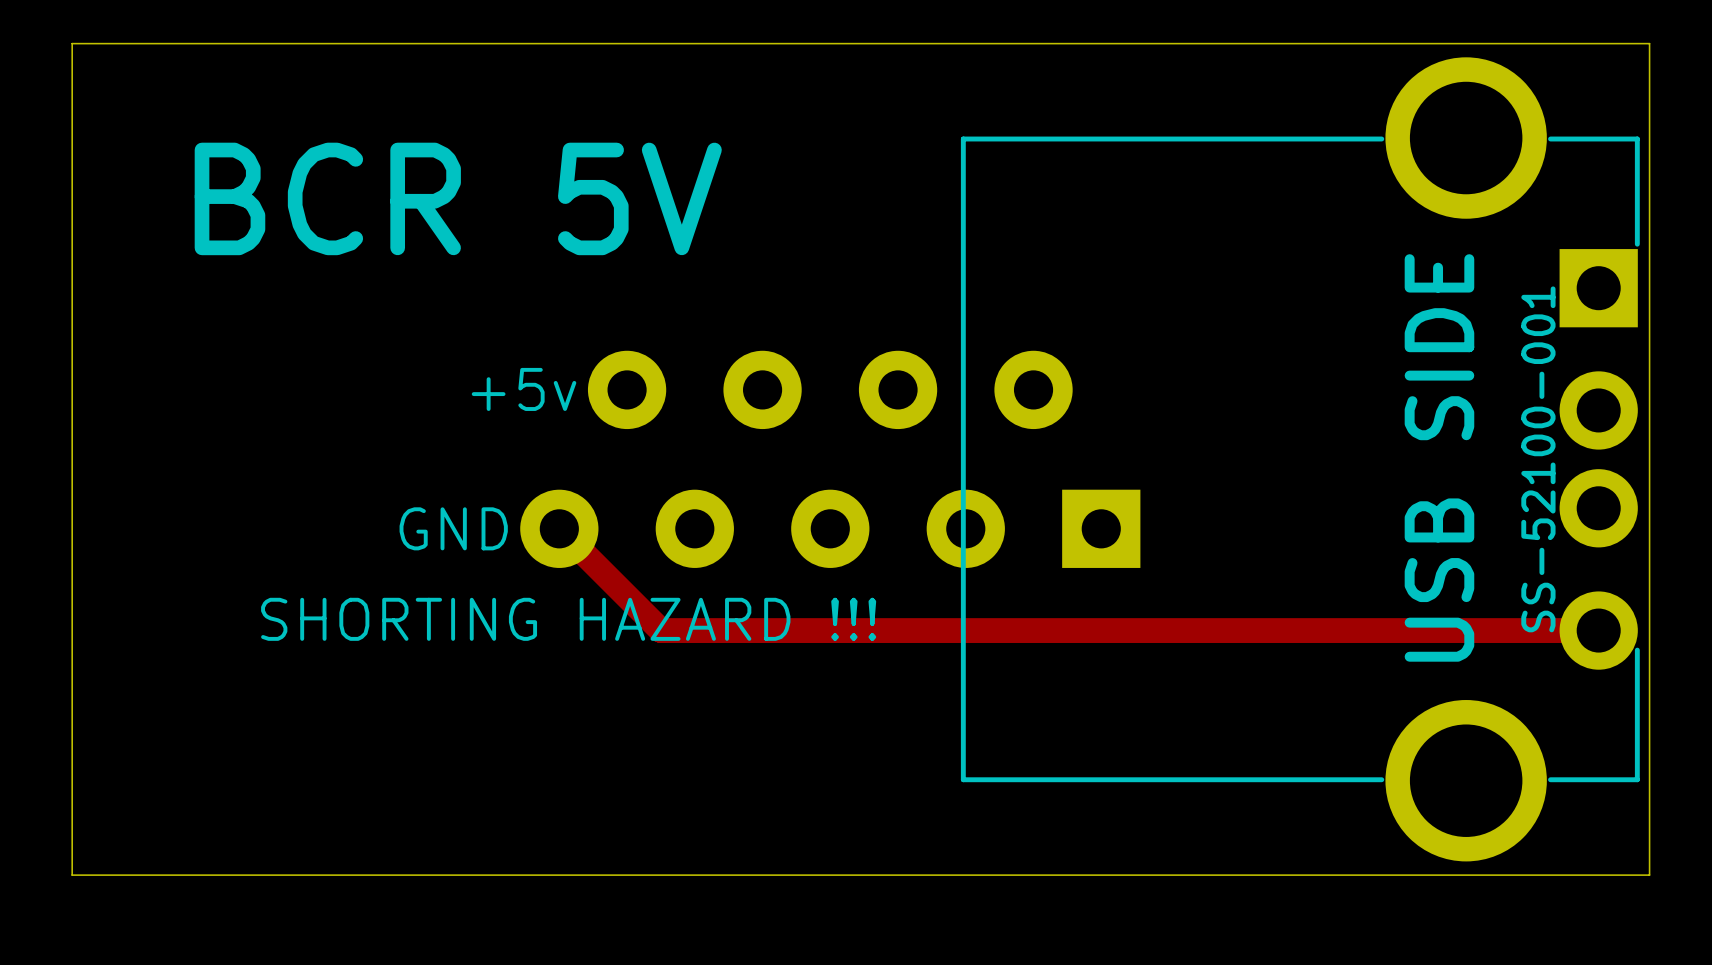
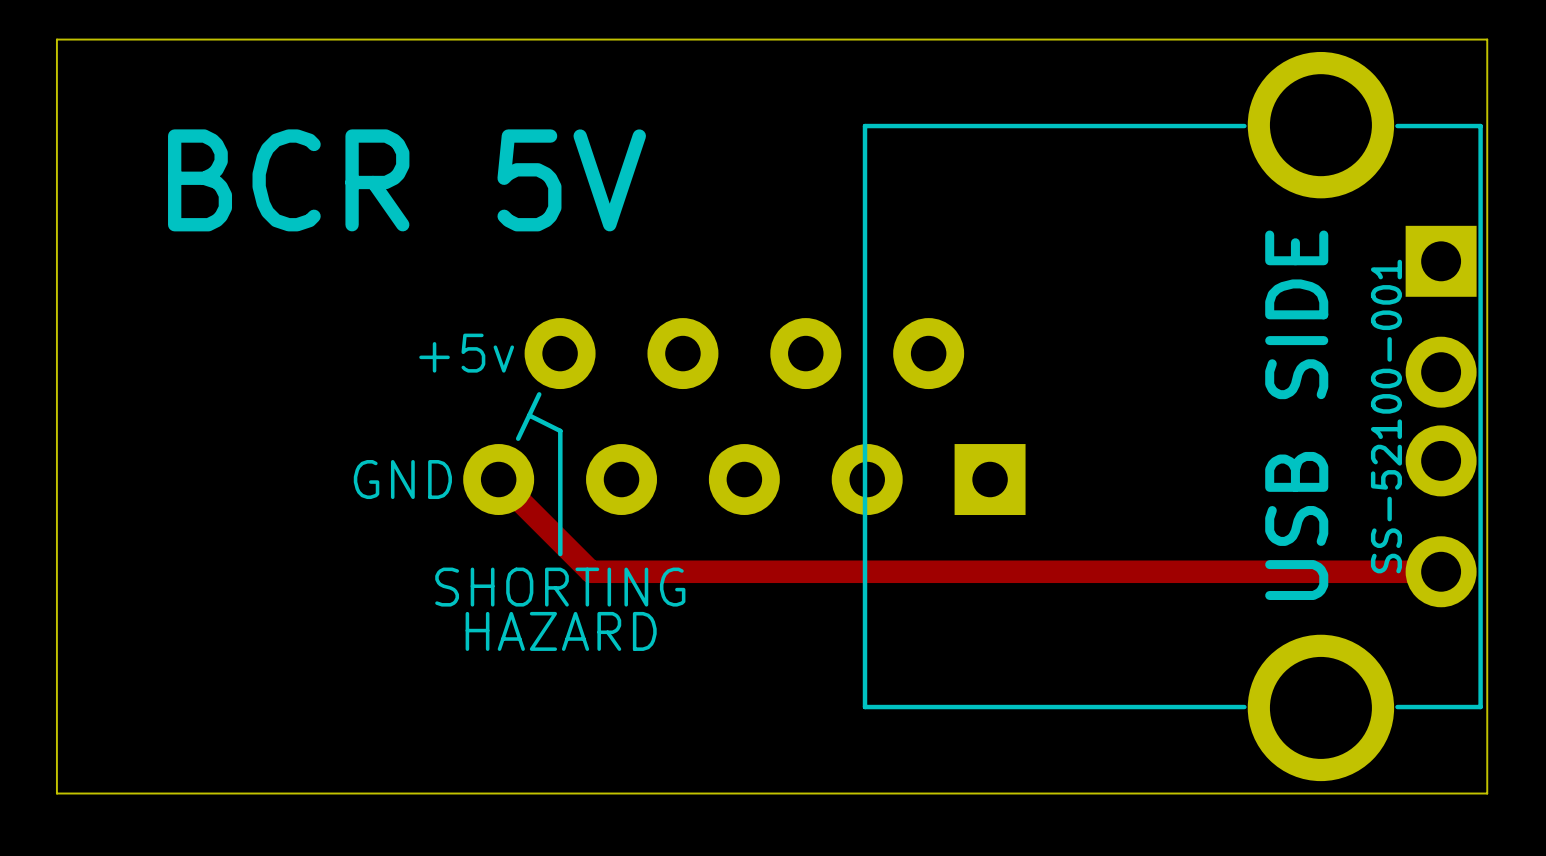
part footprint: [960, 57, 1640, 862] -> [862, 51, 1483, 782]
line: none -> (539, 394) (518, 438)
line: none -> (529, 415) (560, 430) (560, 554)
text: SHORTING HAZARD !!! (568, 619) -> none
text: none -> SHORTING (560, 587)
text: none -> HAZARD (561, 631)

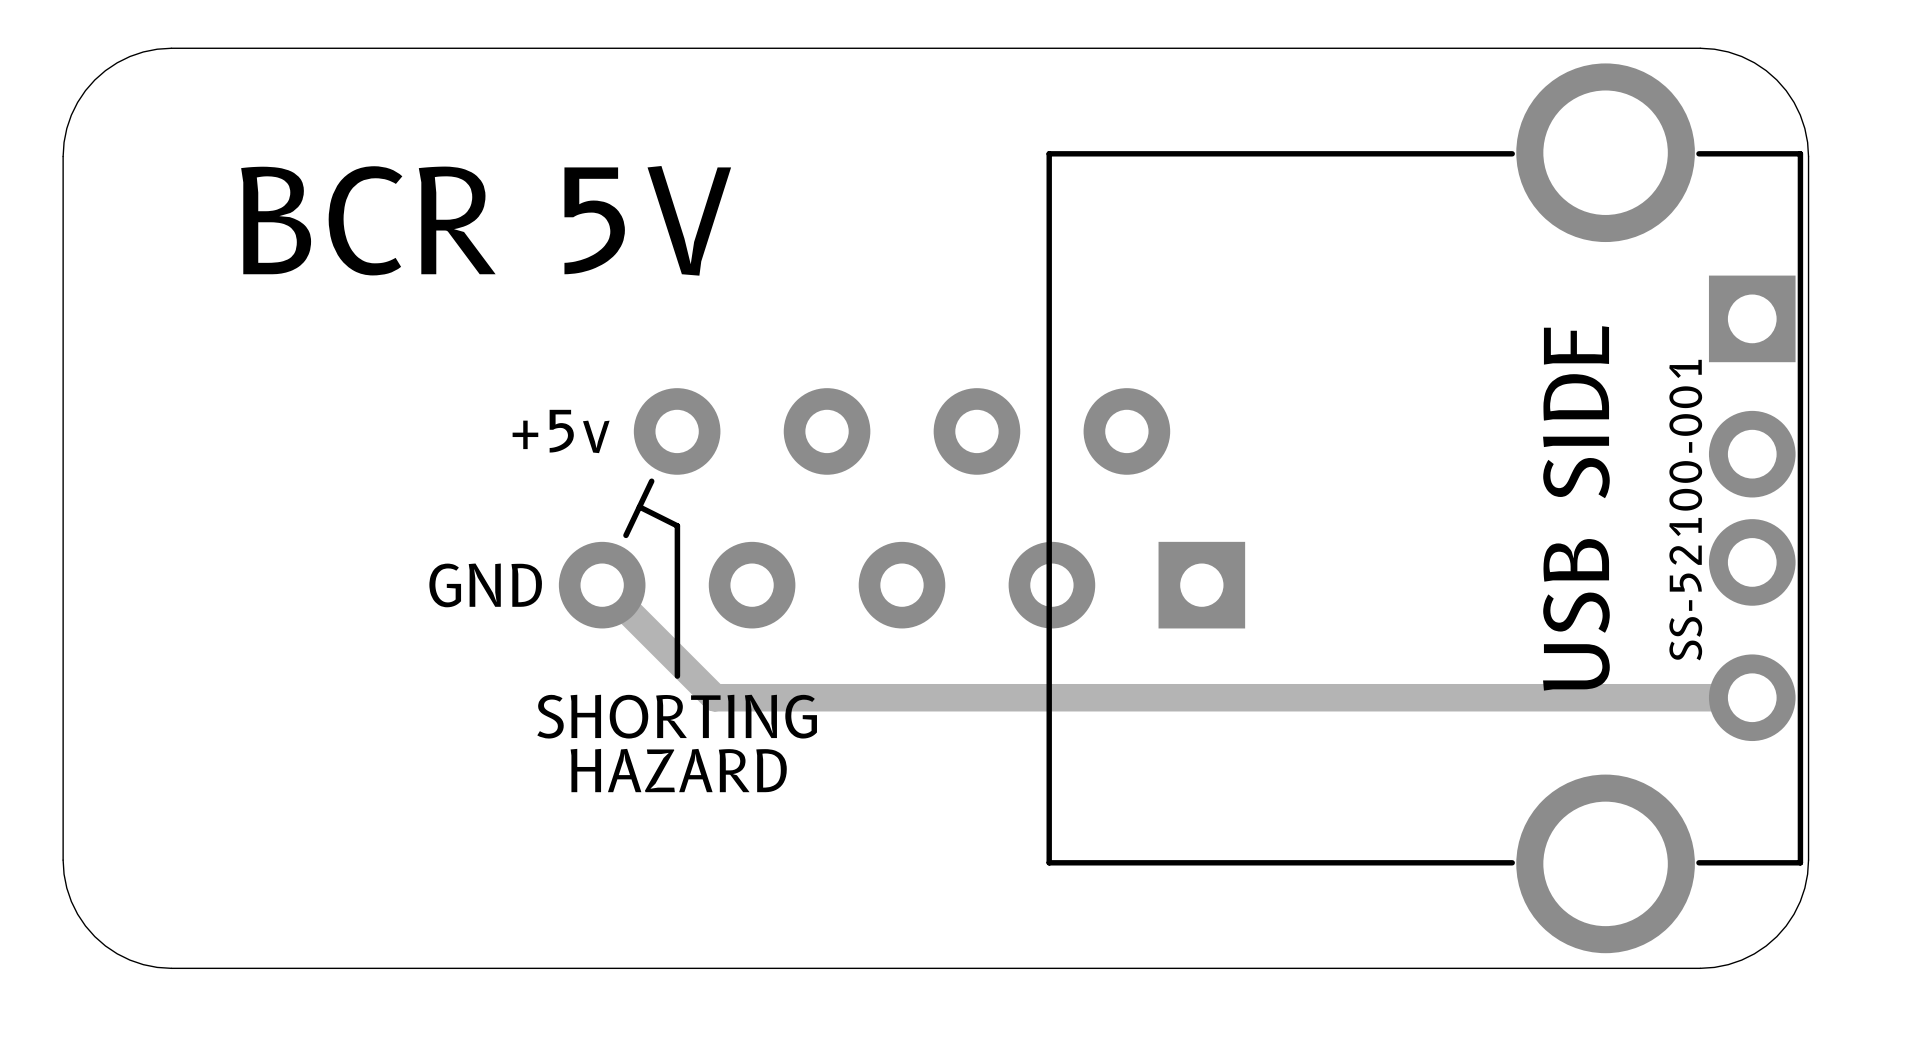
board edge: (145, 39) (56, 39) (56, 128) -> (171, 48) (143, 51) (129, 56) (117, 62) (94, 79) (77, 102) (71, 115) (66, 128) (63, 156)
board edge: (1398, 39) (1487, 39) (1487, 128) -> (1700, 48) (1728, 51) (1741, 56) (1754, 62) (1776, 79) (1786, 90) (1800, 115) (1807, 142) (1808, 156)
board edge: (56, 704) (56, 793) (145, 793) -> (63, 860) (66, 888) (71, 901) (77, 914) (94, 936) (117, 953) (129, 960) (143, 964) (171, 968)
board edge: (1487, 704) (1487, 793) (1398, 793) -> (1808, 860) (1807, 874) (1800, 901) (1786, 925) (1776, 936) (1754, 953) (1741, 960) (1728, 964) (1700, 968)

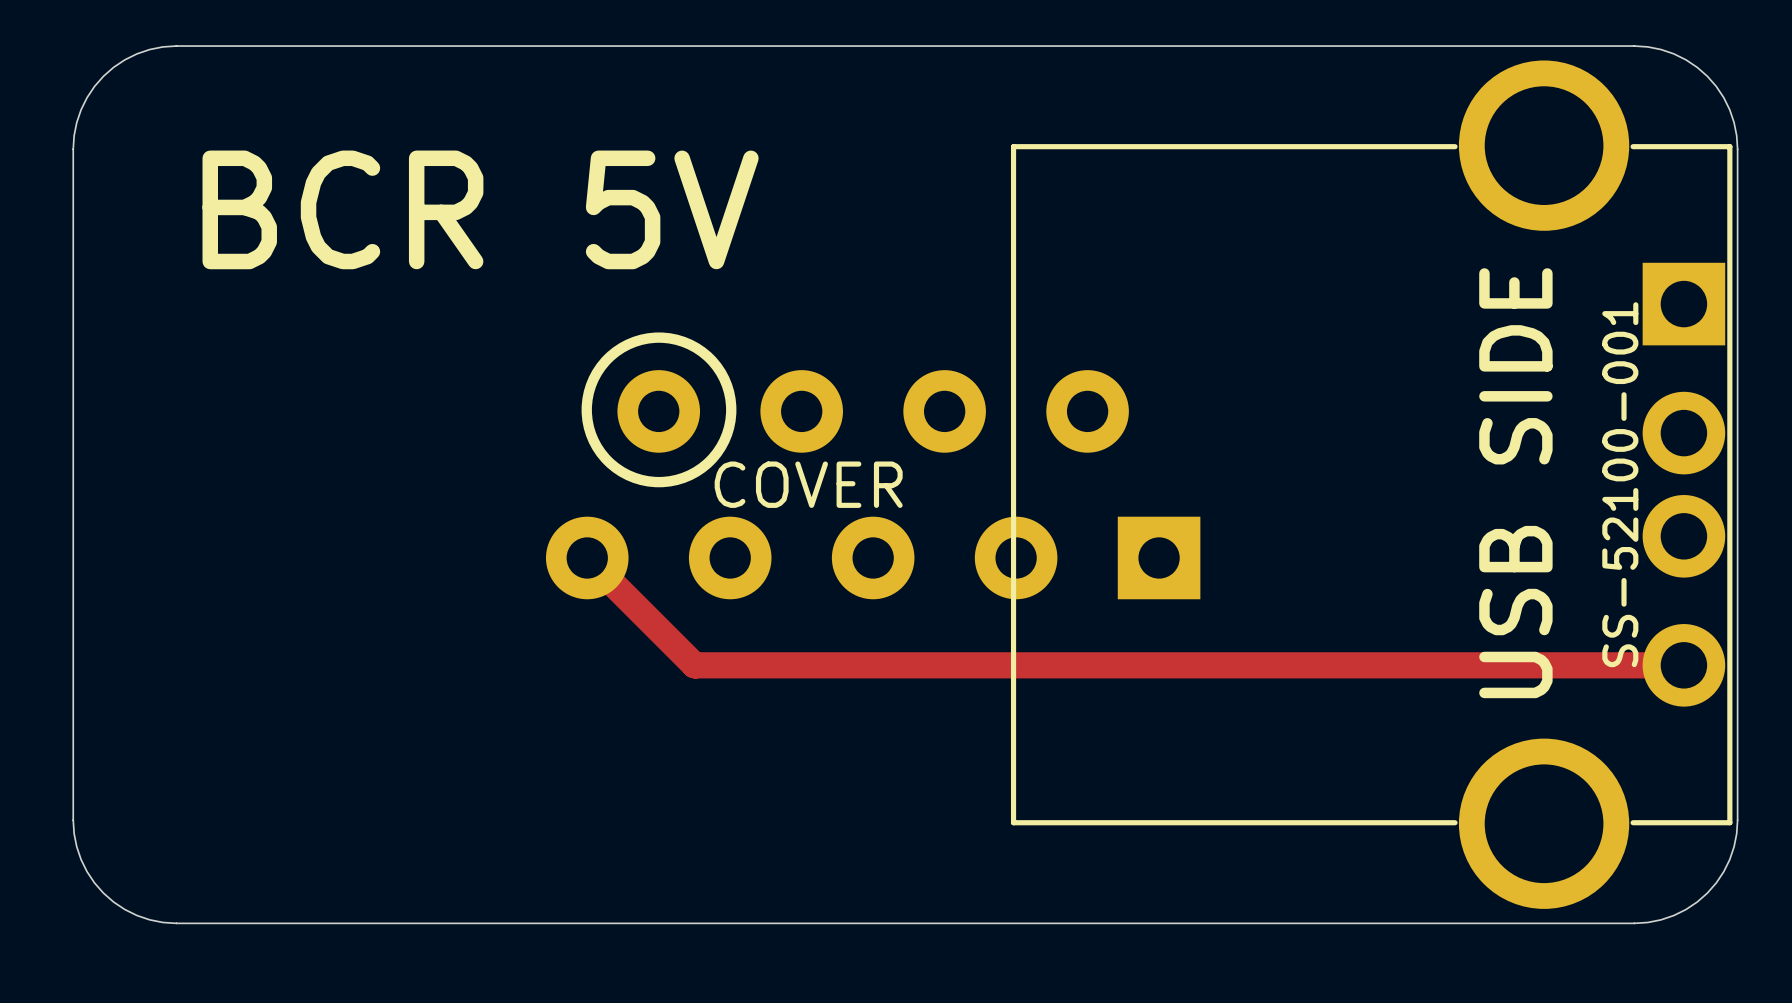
drawing: none -> [581, 332, 737, 488]
text: +5v (561, 431) -> none
line: (651, 481) (625, 535) -> none
line: (639, 506) (677, 525) (677, 676) -> none
text: none -> COVER (808, 484)
text: GND (485, 585) -> none
text: SHORTING (677, 716) -> none
text: HAZARD (678, 770) -> none

